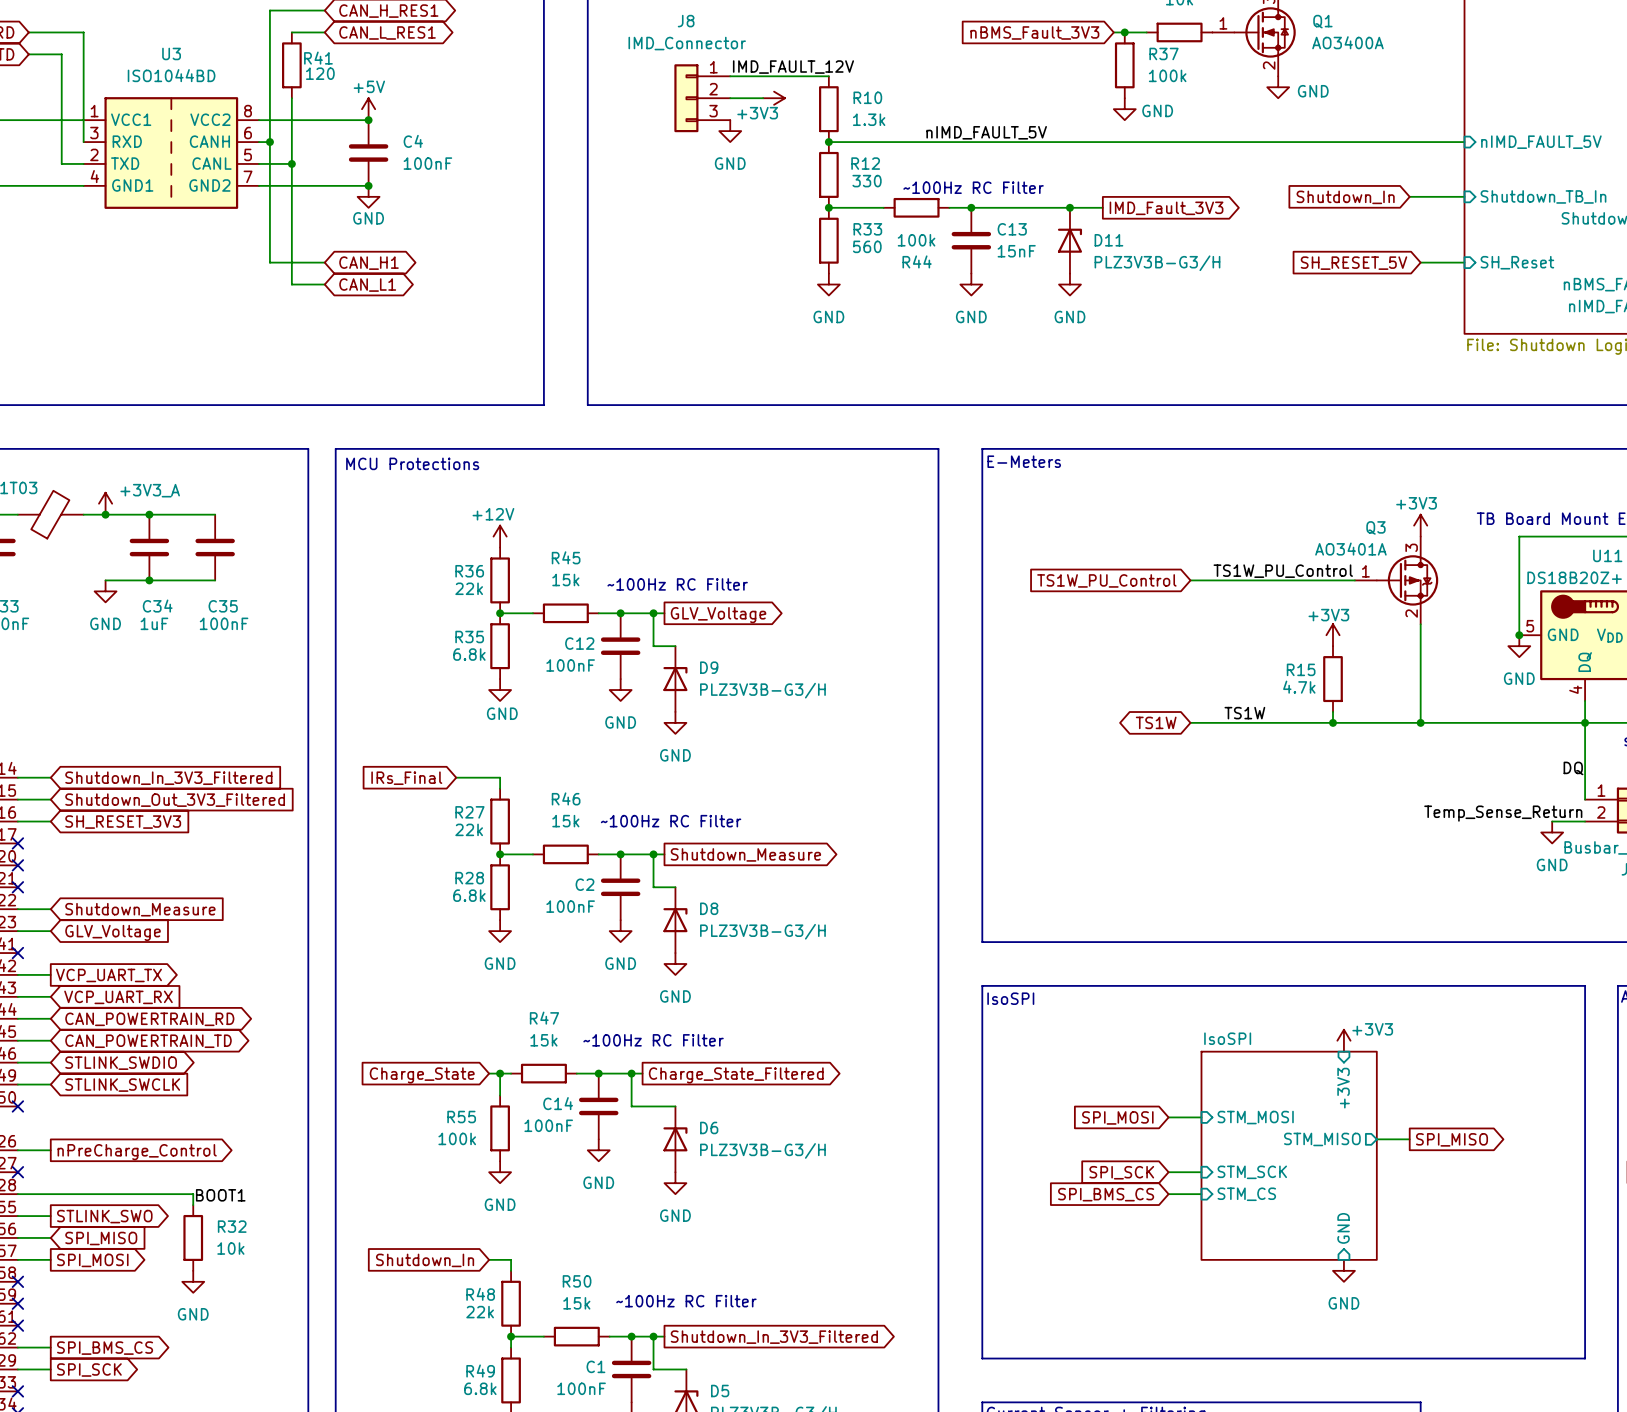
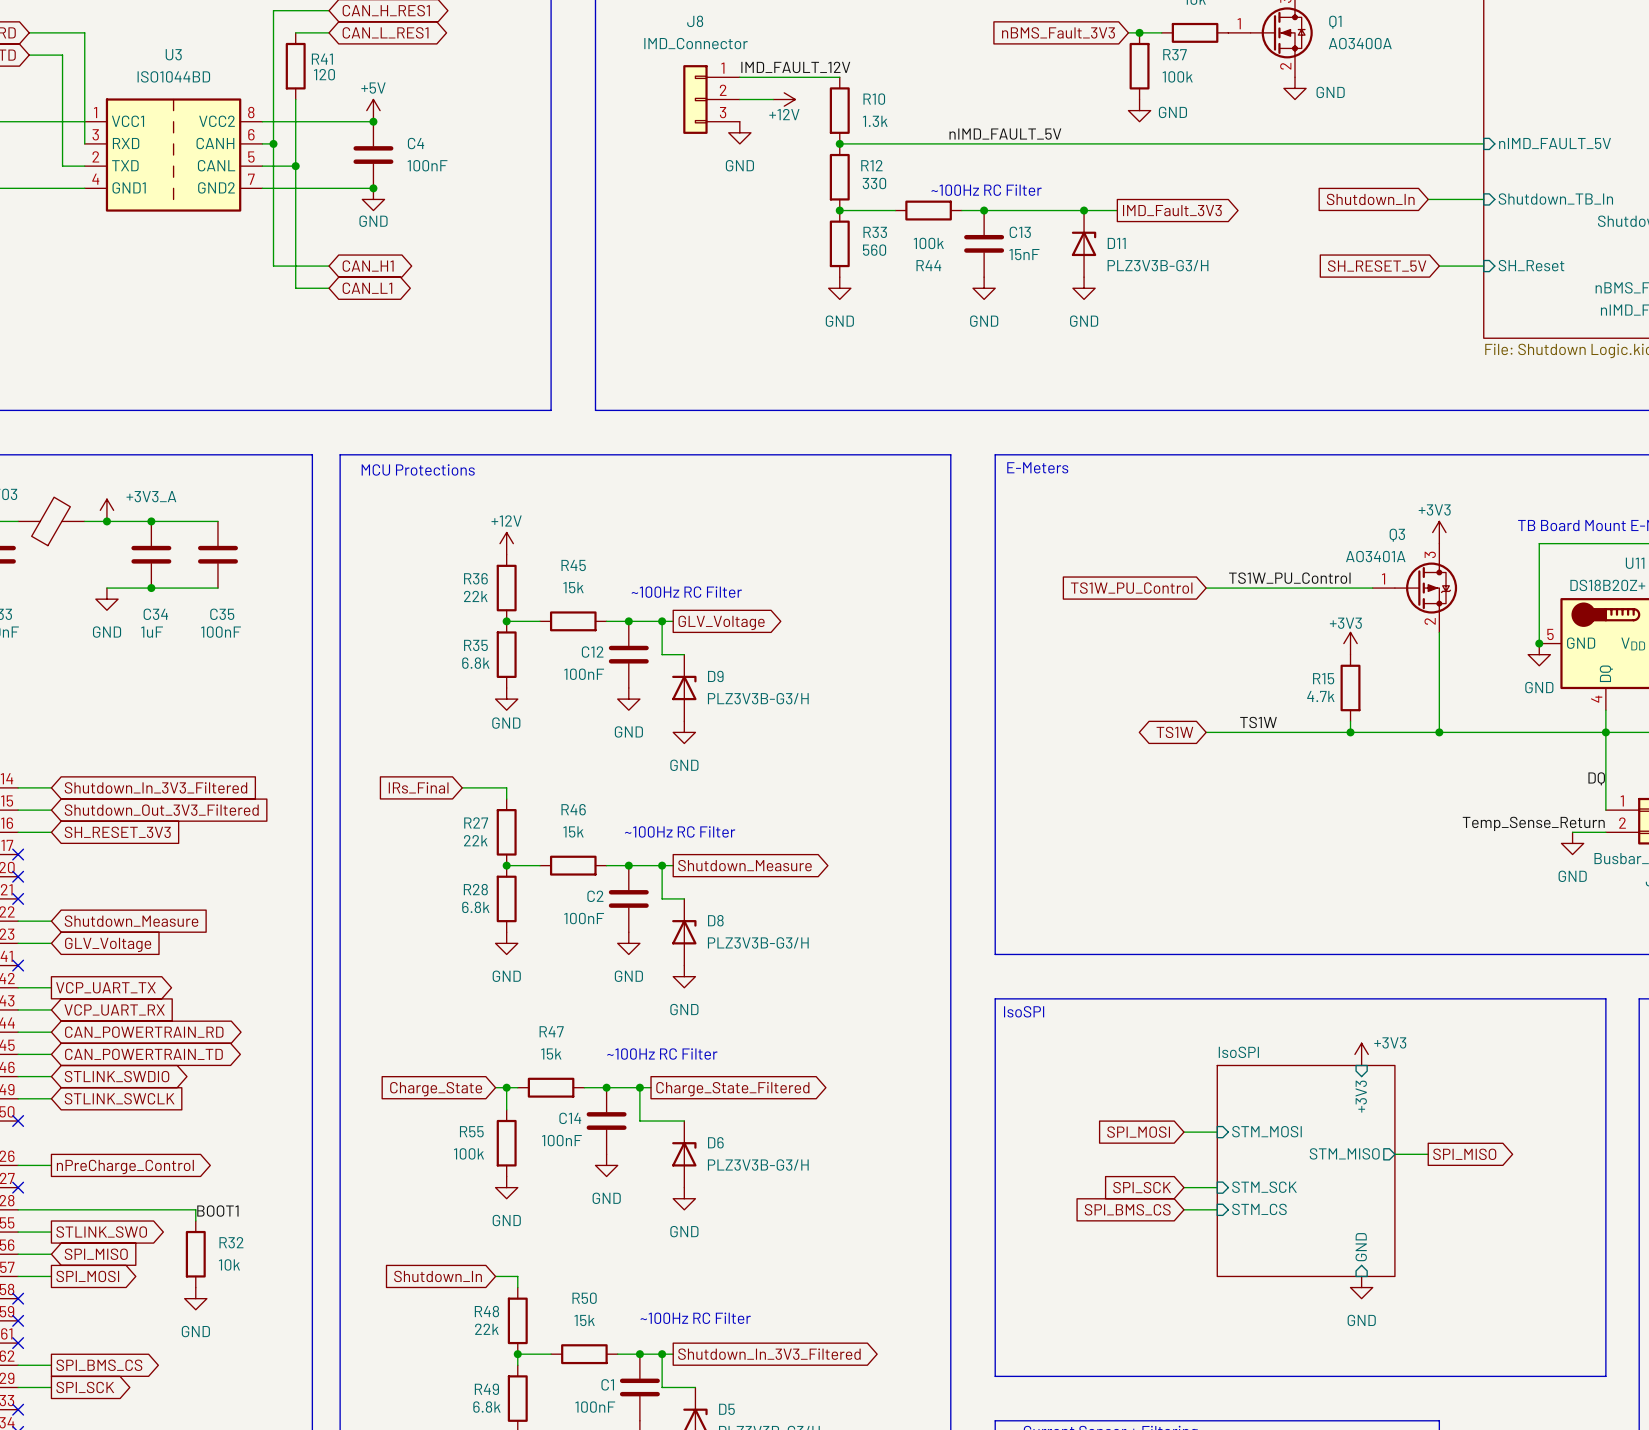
power symbol: +3V3 (774, 98) -> +12V (784, 99)

